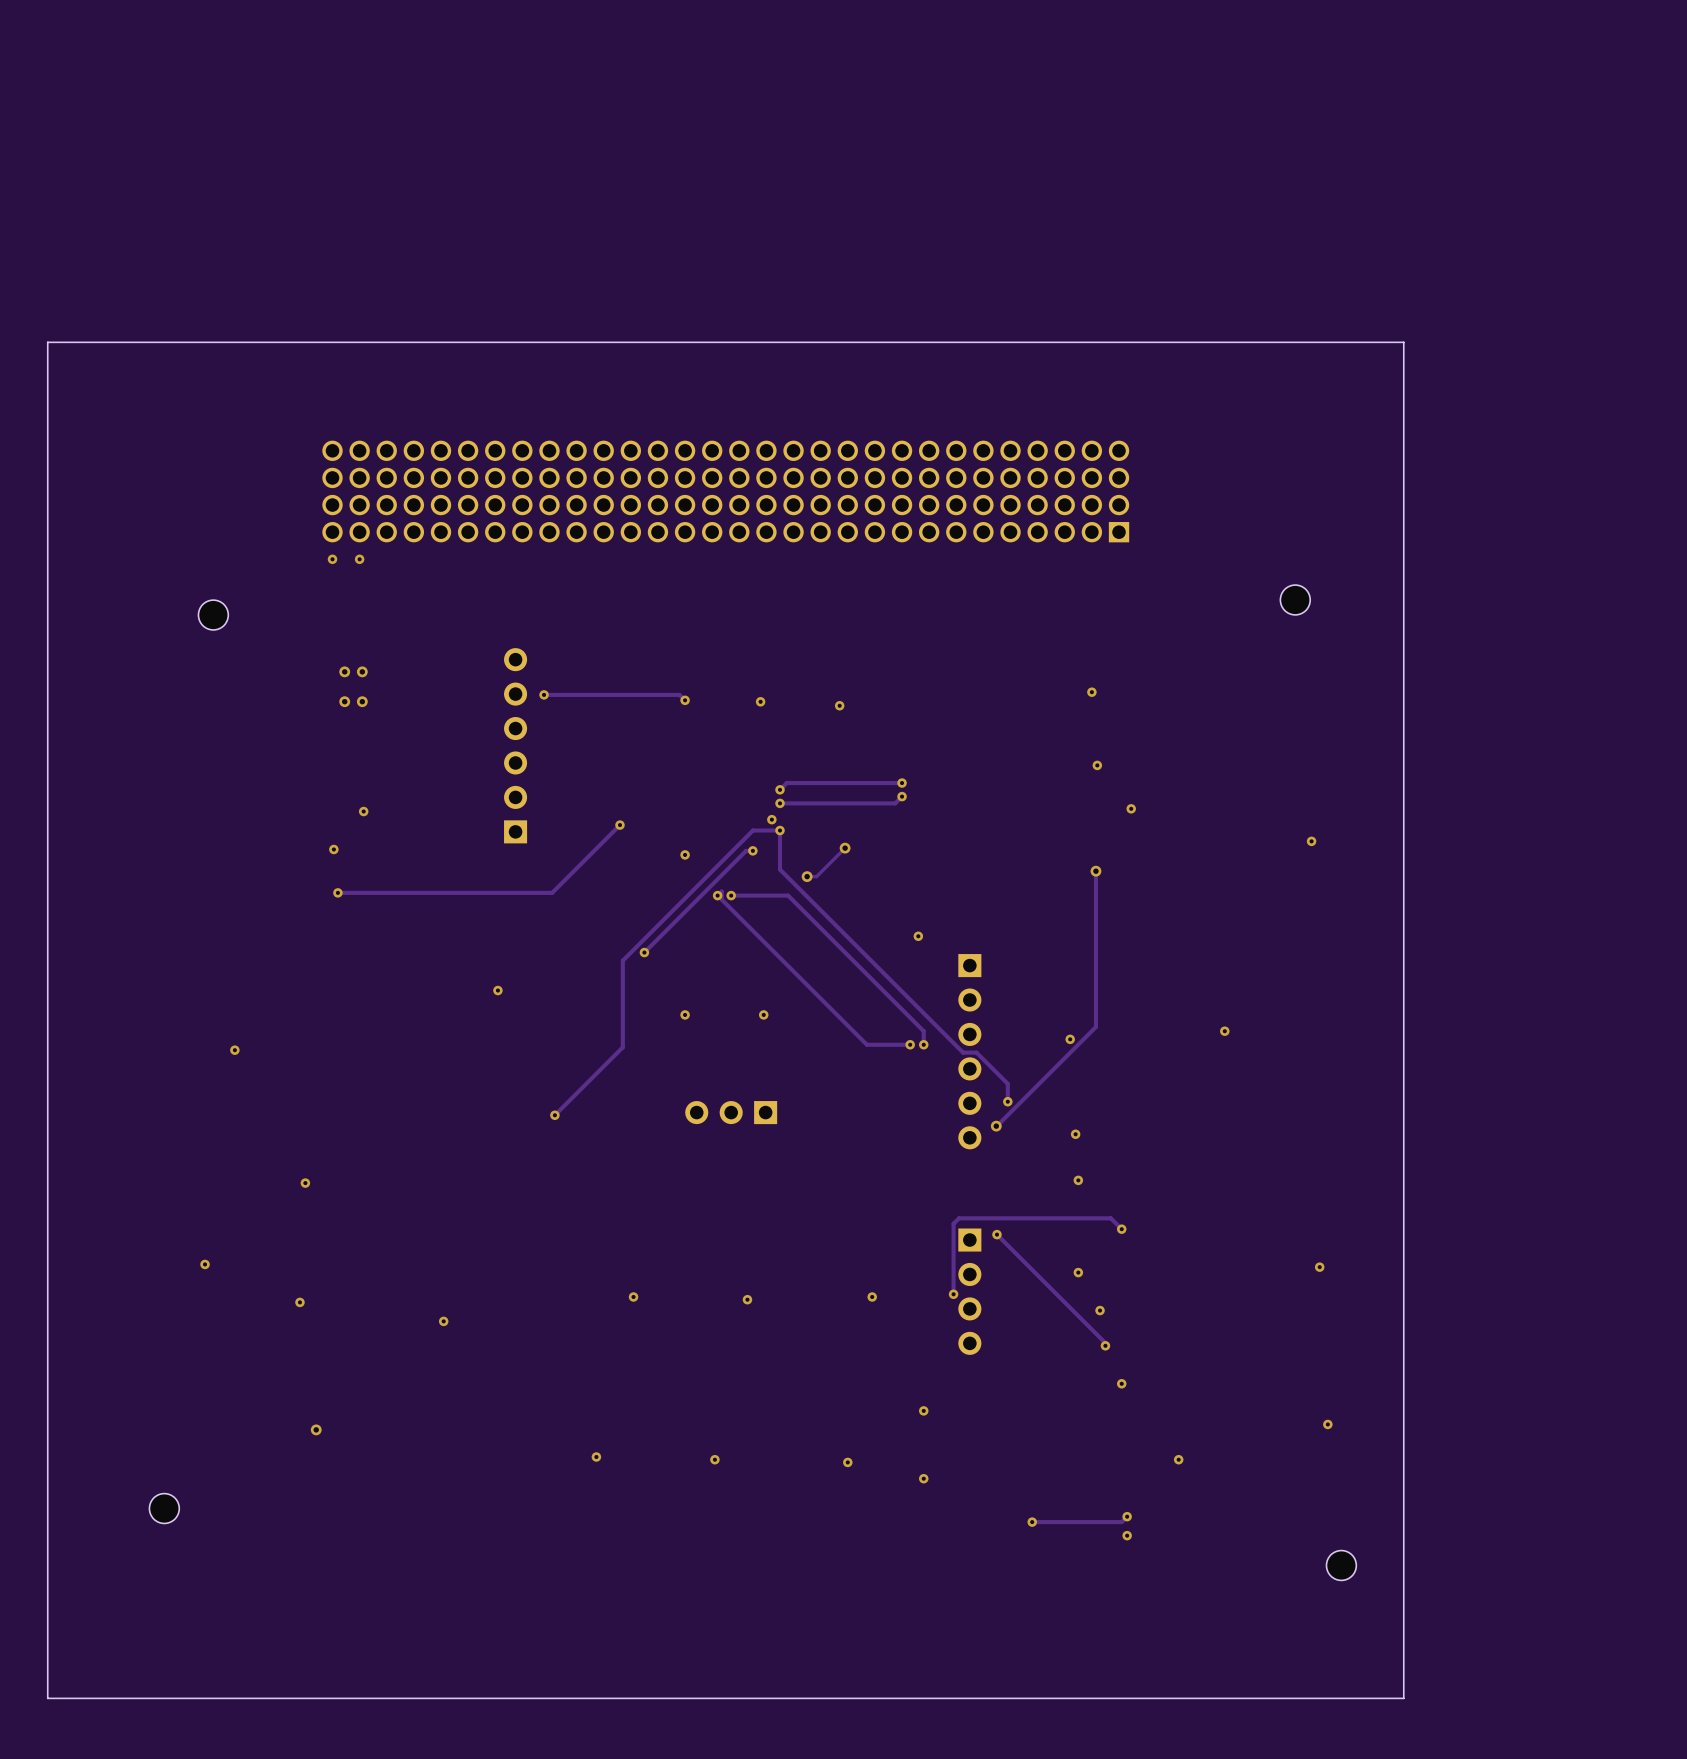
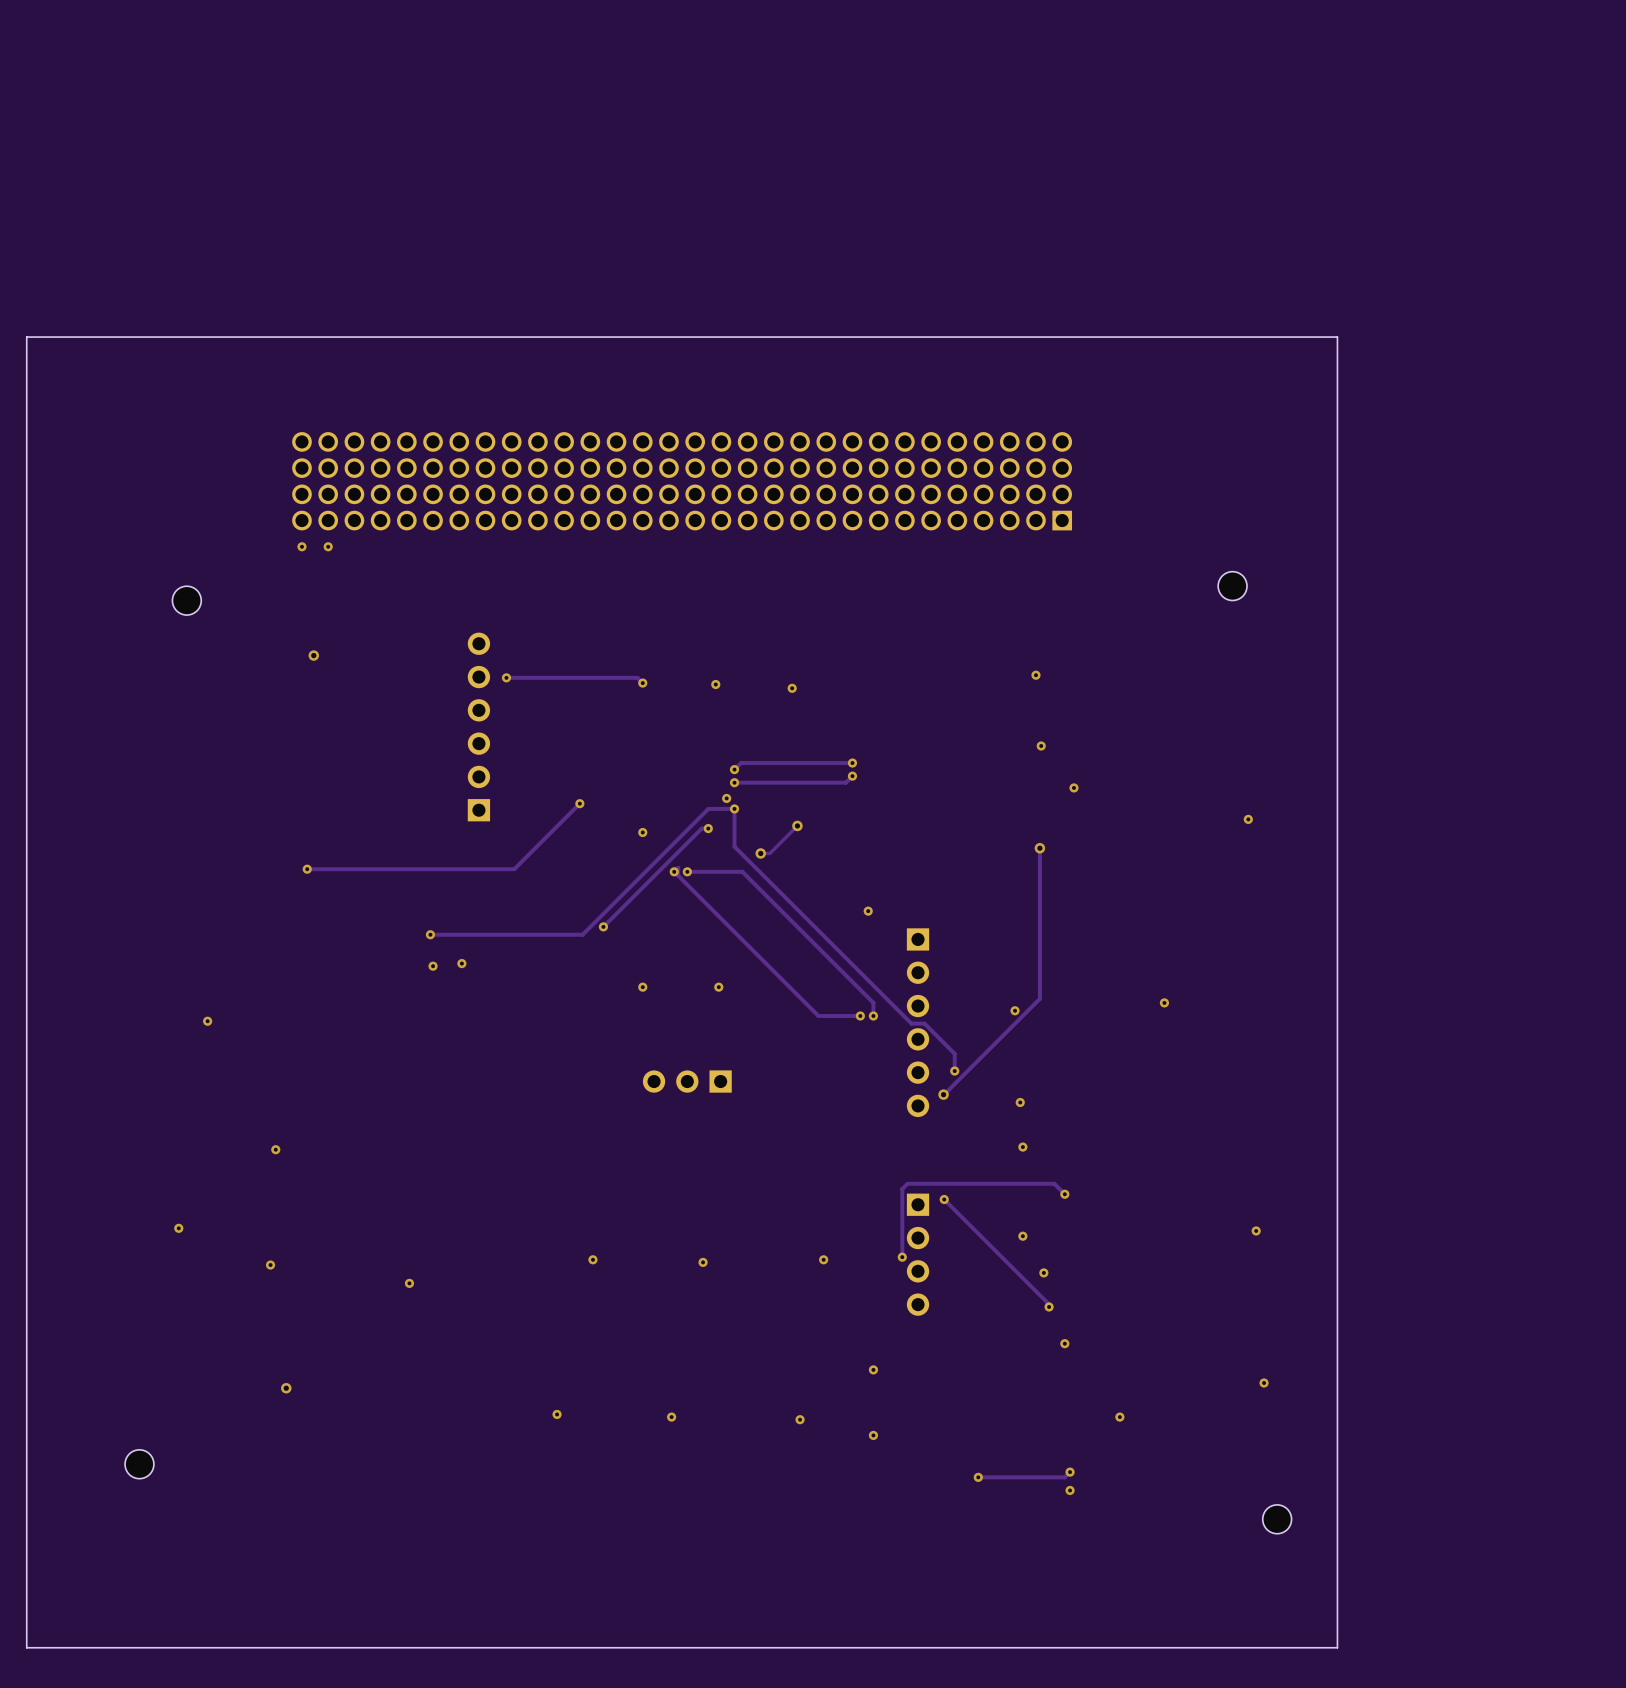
via: (362, 671) -> none
via: (344, 701) -> none
via: (362, 701) -> none
via: (363, 811) -> none
via: (333, 849) -> none
via: none -> (430, 934)
track: (622, 960) (622, 1047) (554, 1115) -> (582, 934) (430, 934)
via: none -> (433, 966)
via: (554, 1115) -> none

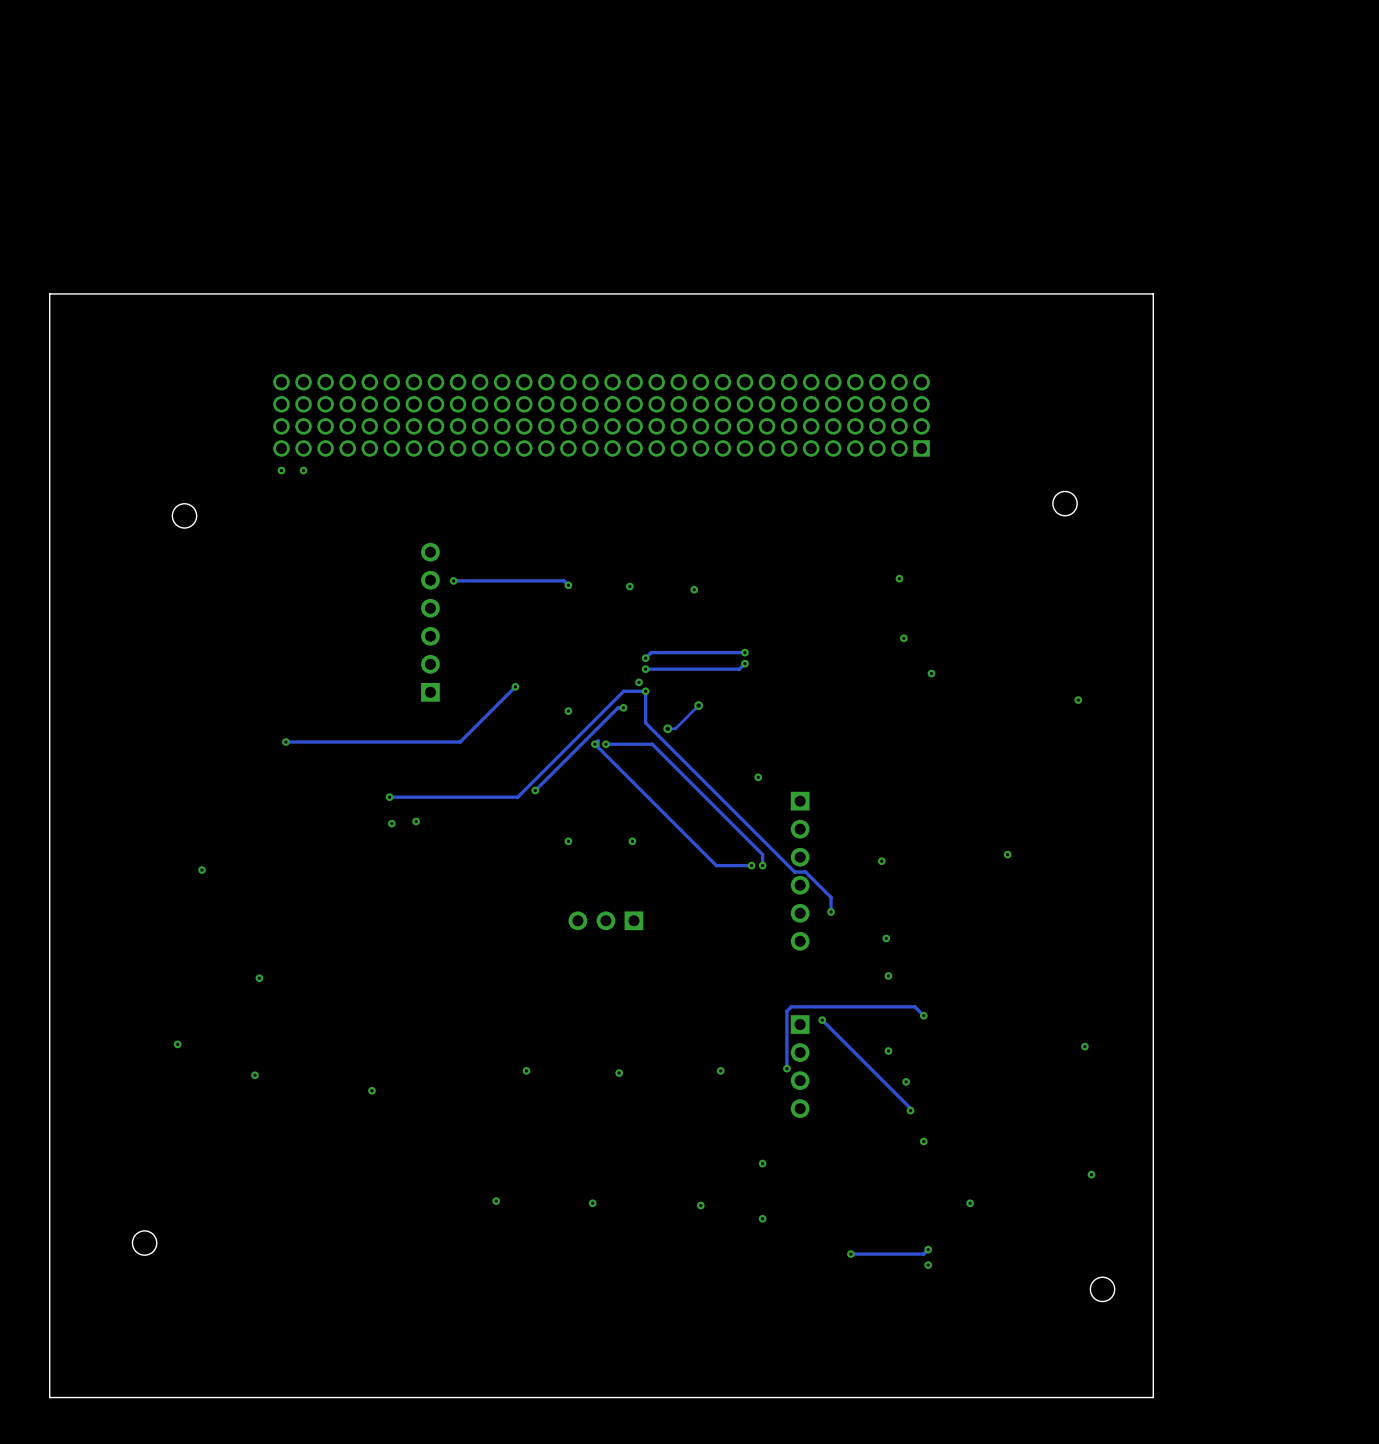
via: (313, 655) -> none
track: (1039, 848) (1039, 998) (943, 1094) -> none
via: (1039, 848) -> none
via: (943, 1094) -> none
via: (286, 1388) -> none

